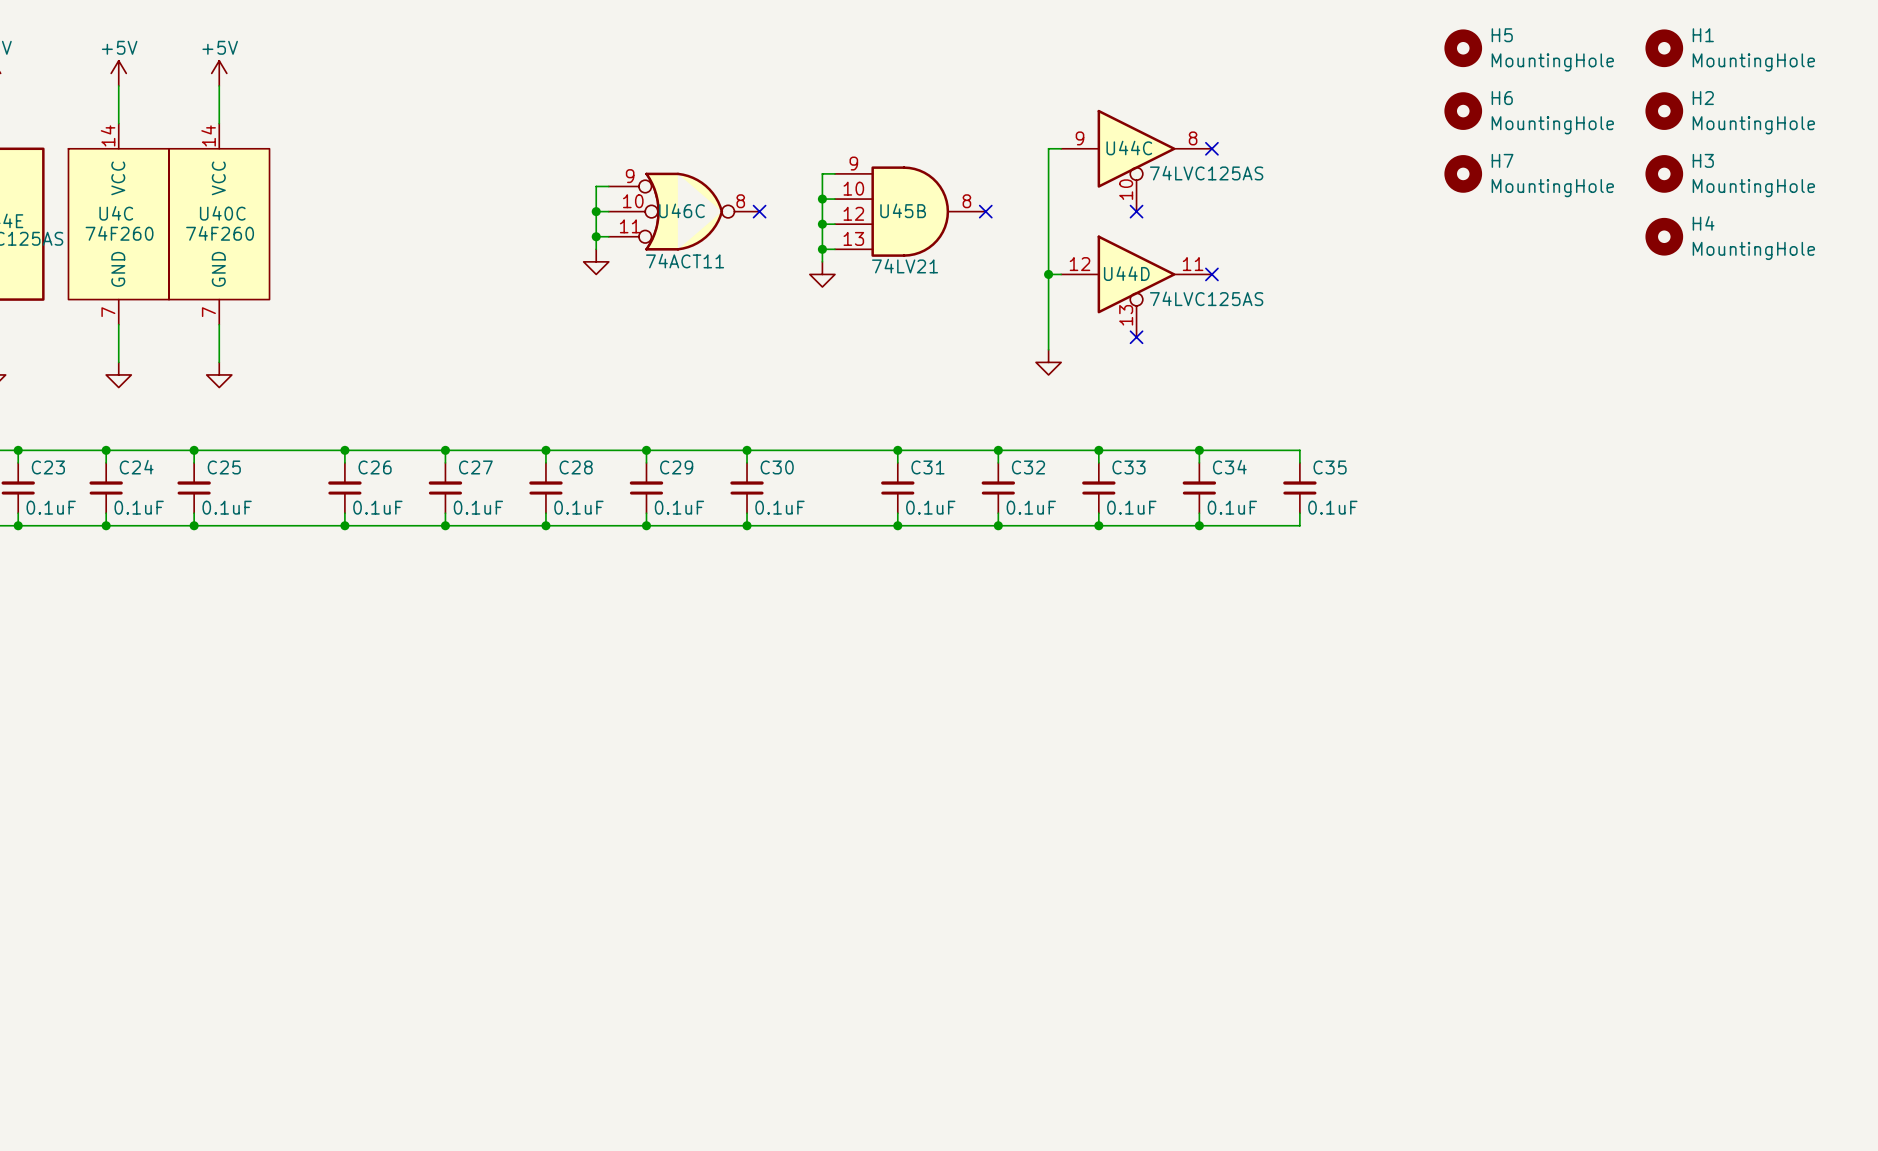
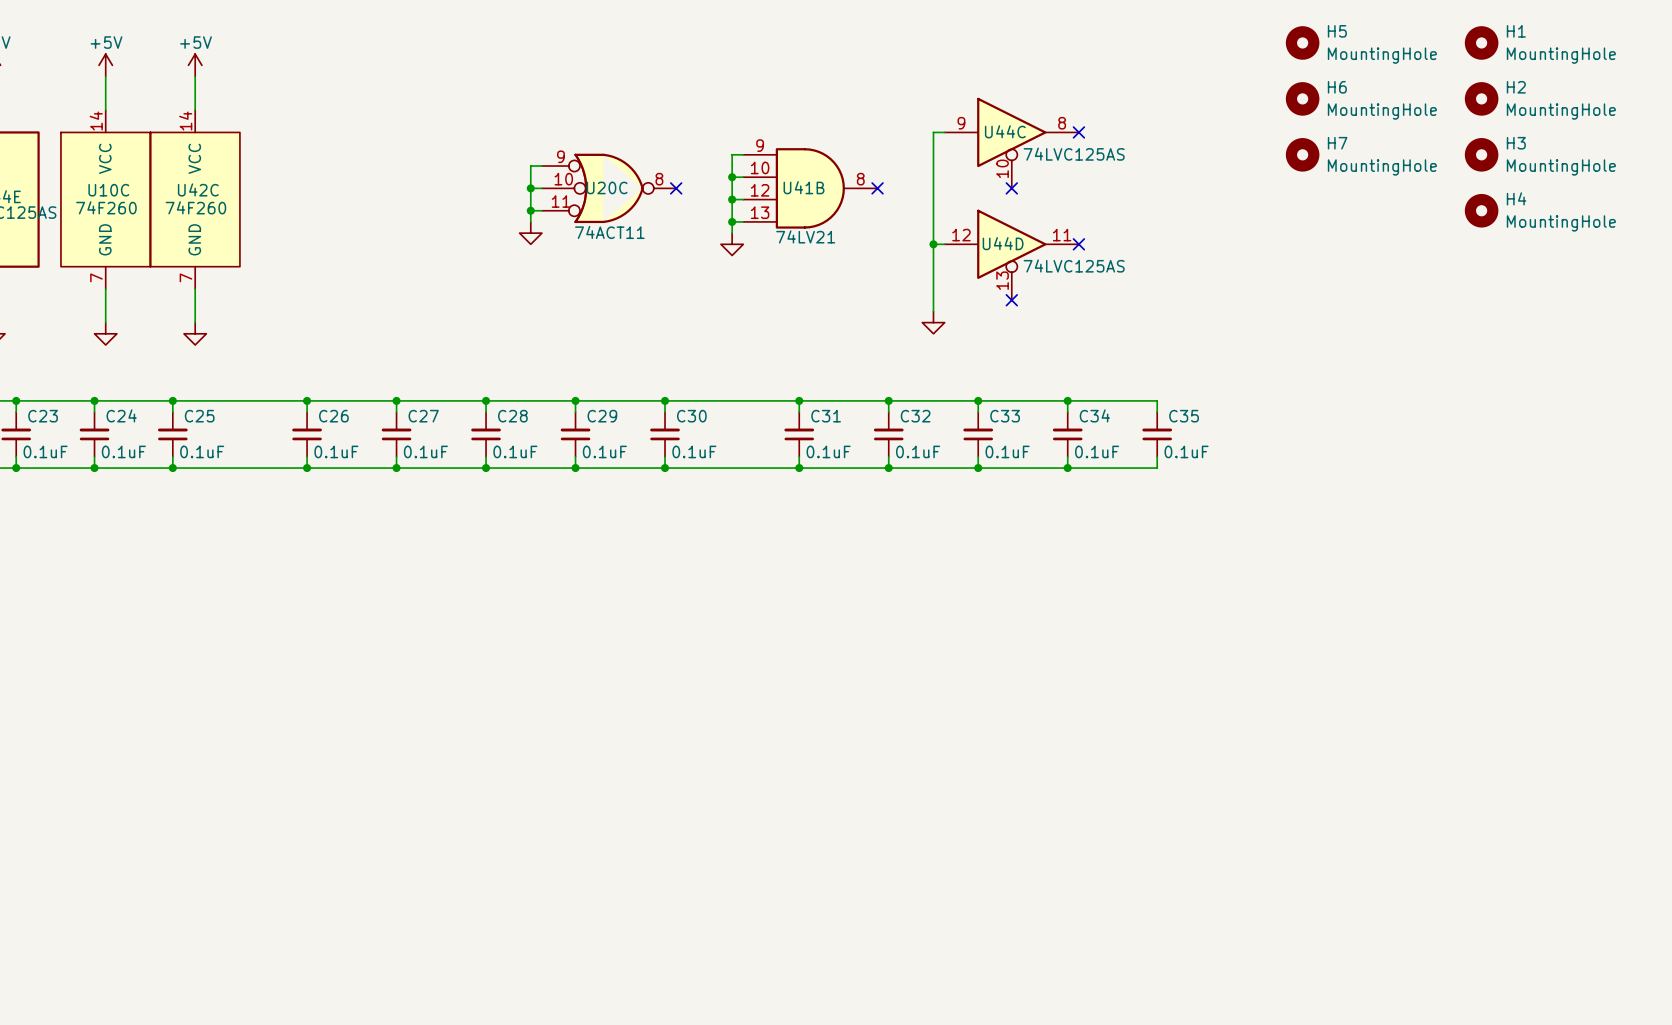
U46C name: U46C (681, 210) -> U20C (607, 187)
U45B name: U45B (903, 210) -> U41B (803, 187)
U4C name: U4C (116, 213) -> U10C (108, 190)
U40C name: U40C (222, 213) -> U42C (198, 189)

